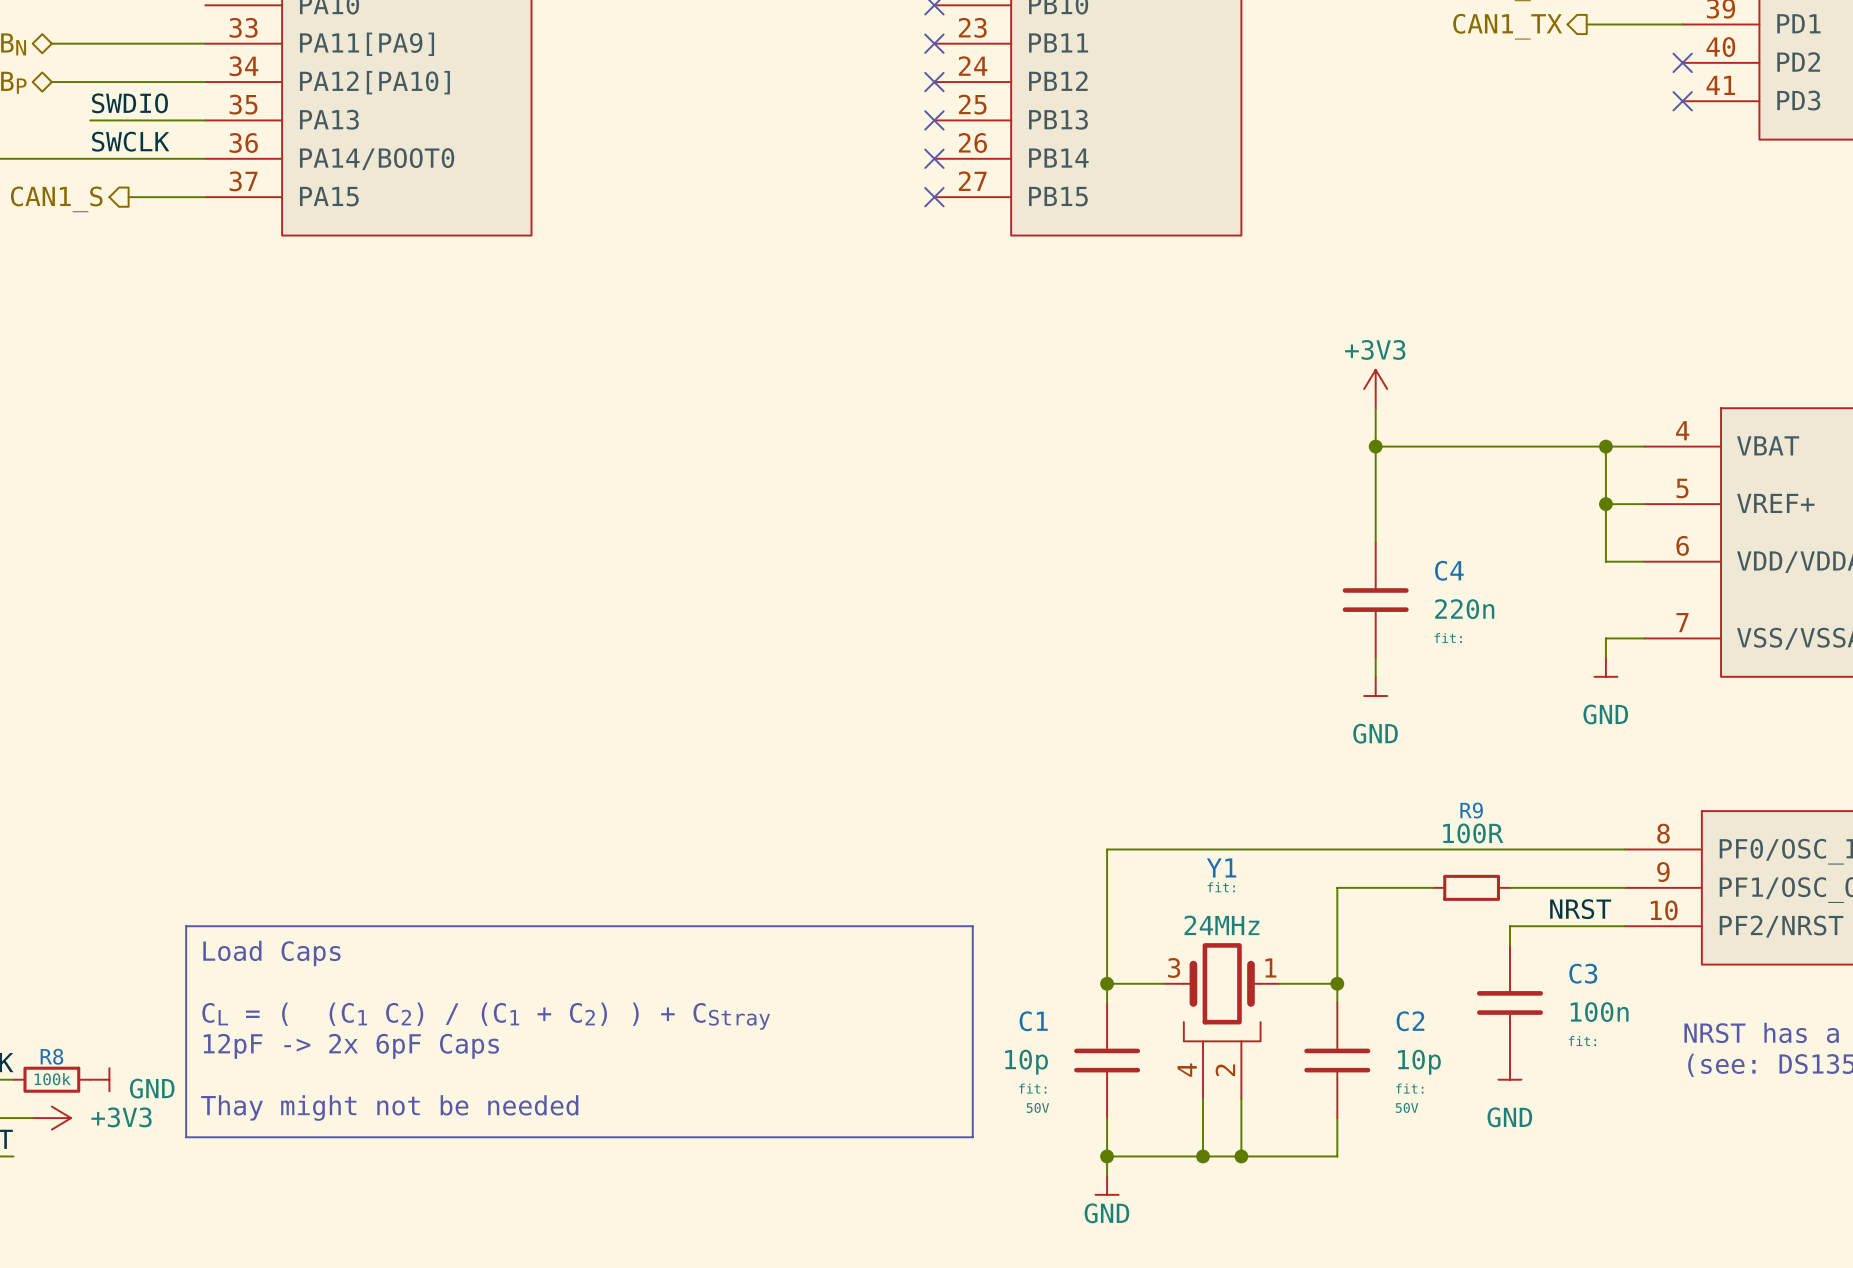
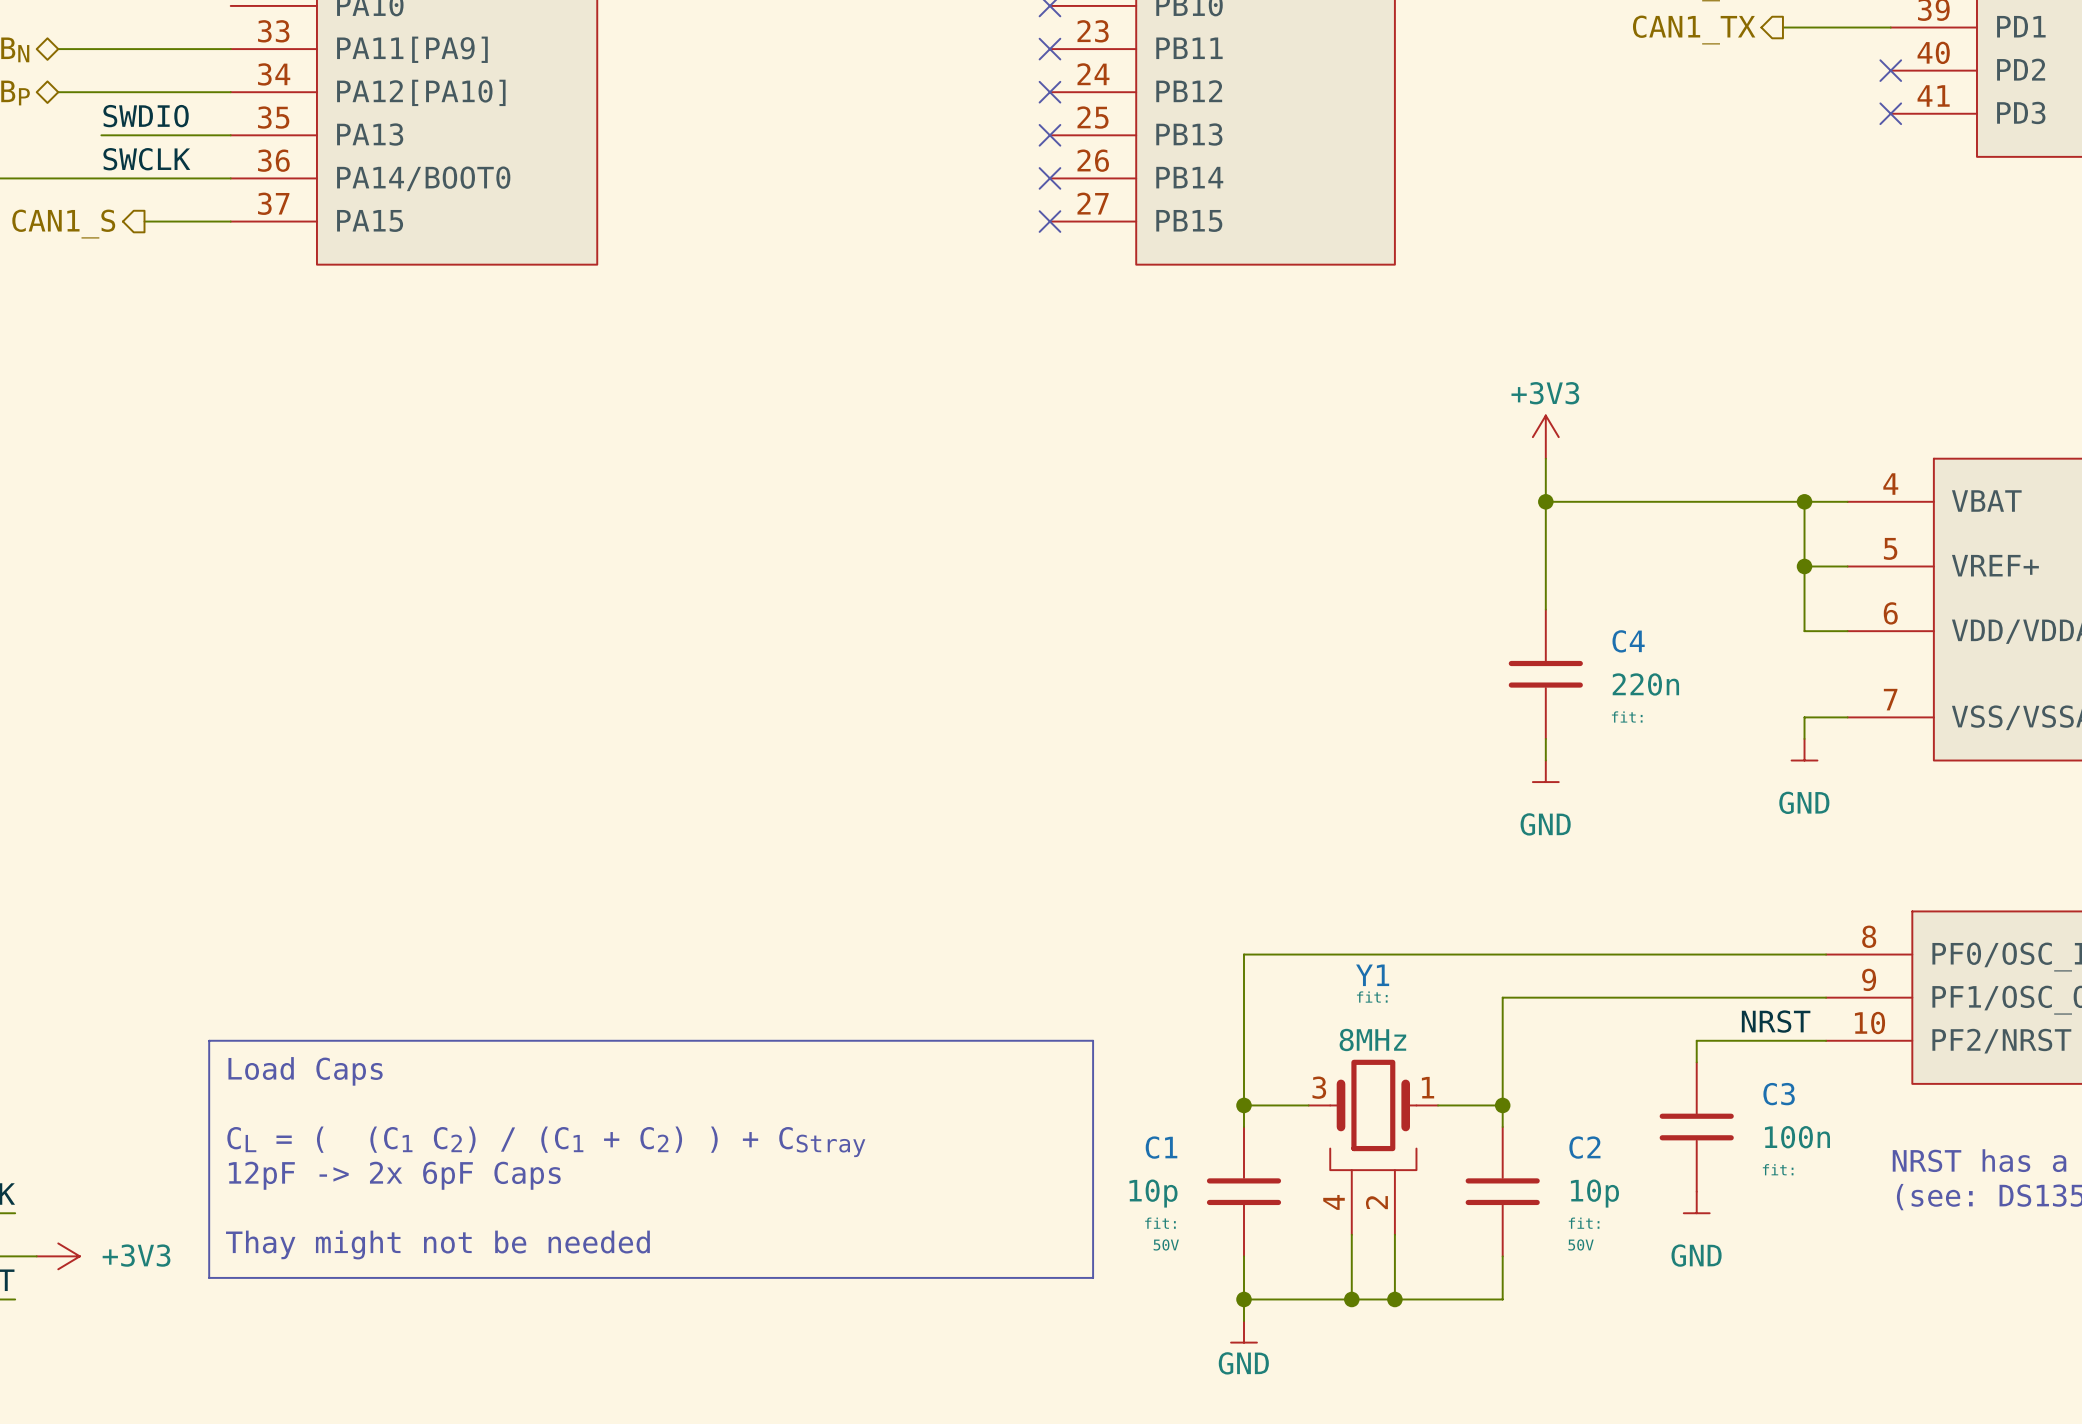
wire: none -> (1610, 997) (1696, 997)
R9: 100R (1471, 887) -> none
Y1 text: 24MHz (1221, 925) -> 8MHz (1372, 1039)
R8: 100k (51, 1079) -> none
power symbol: GND (99, 1079) -> none

